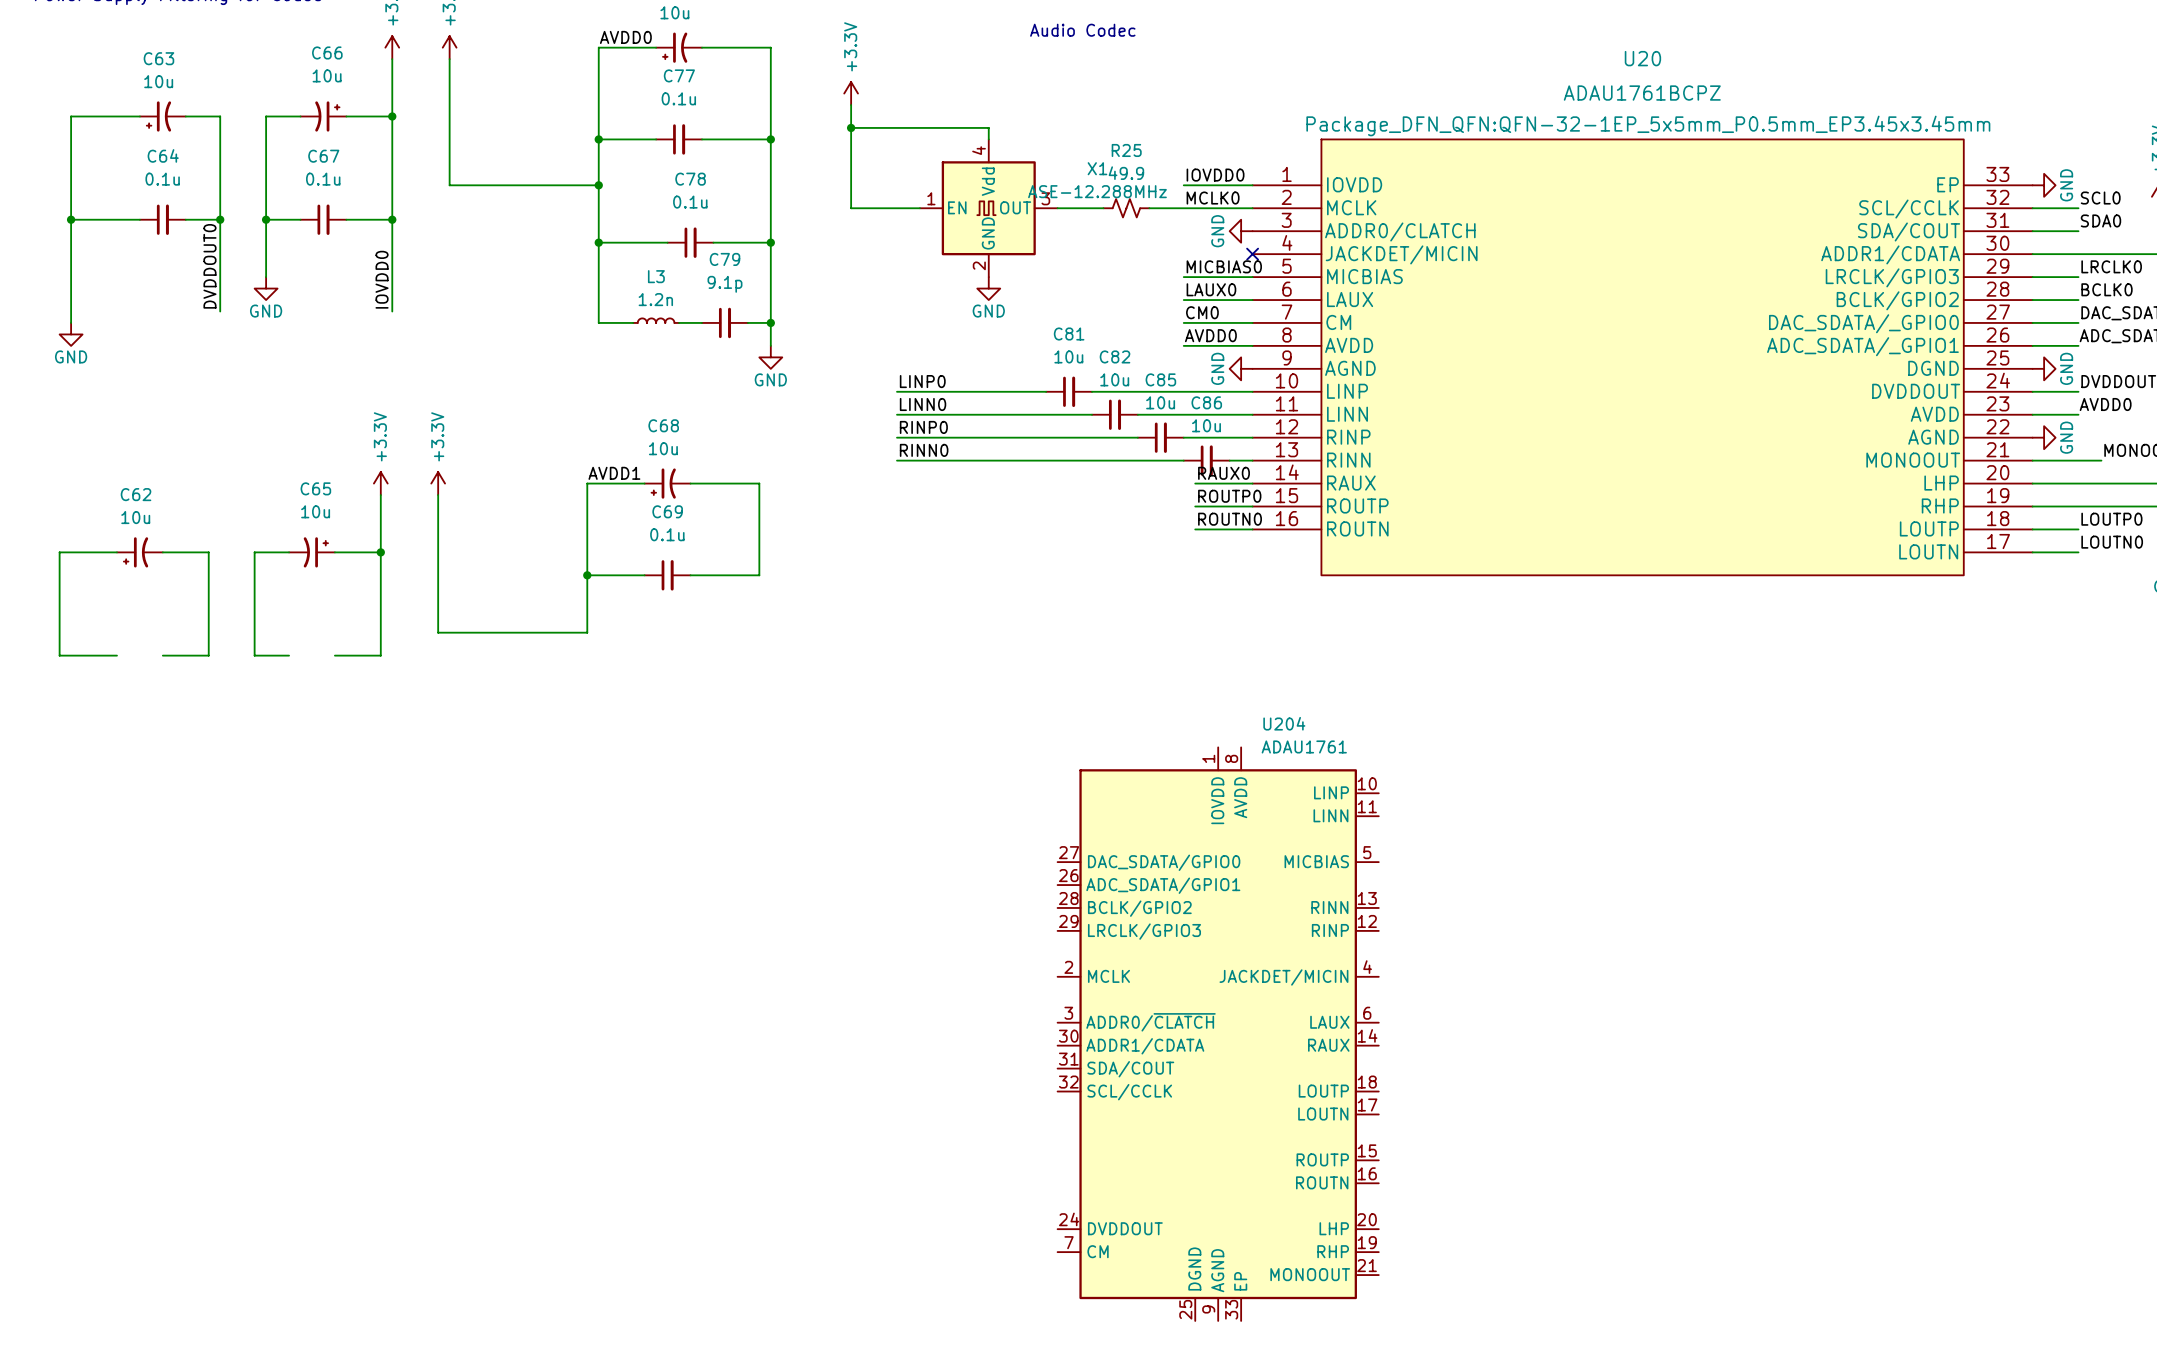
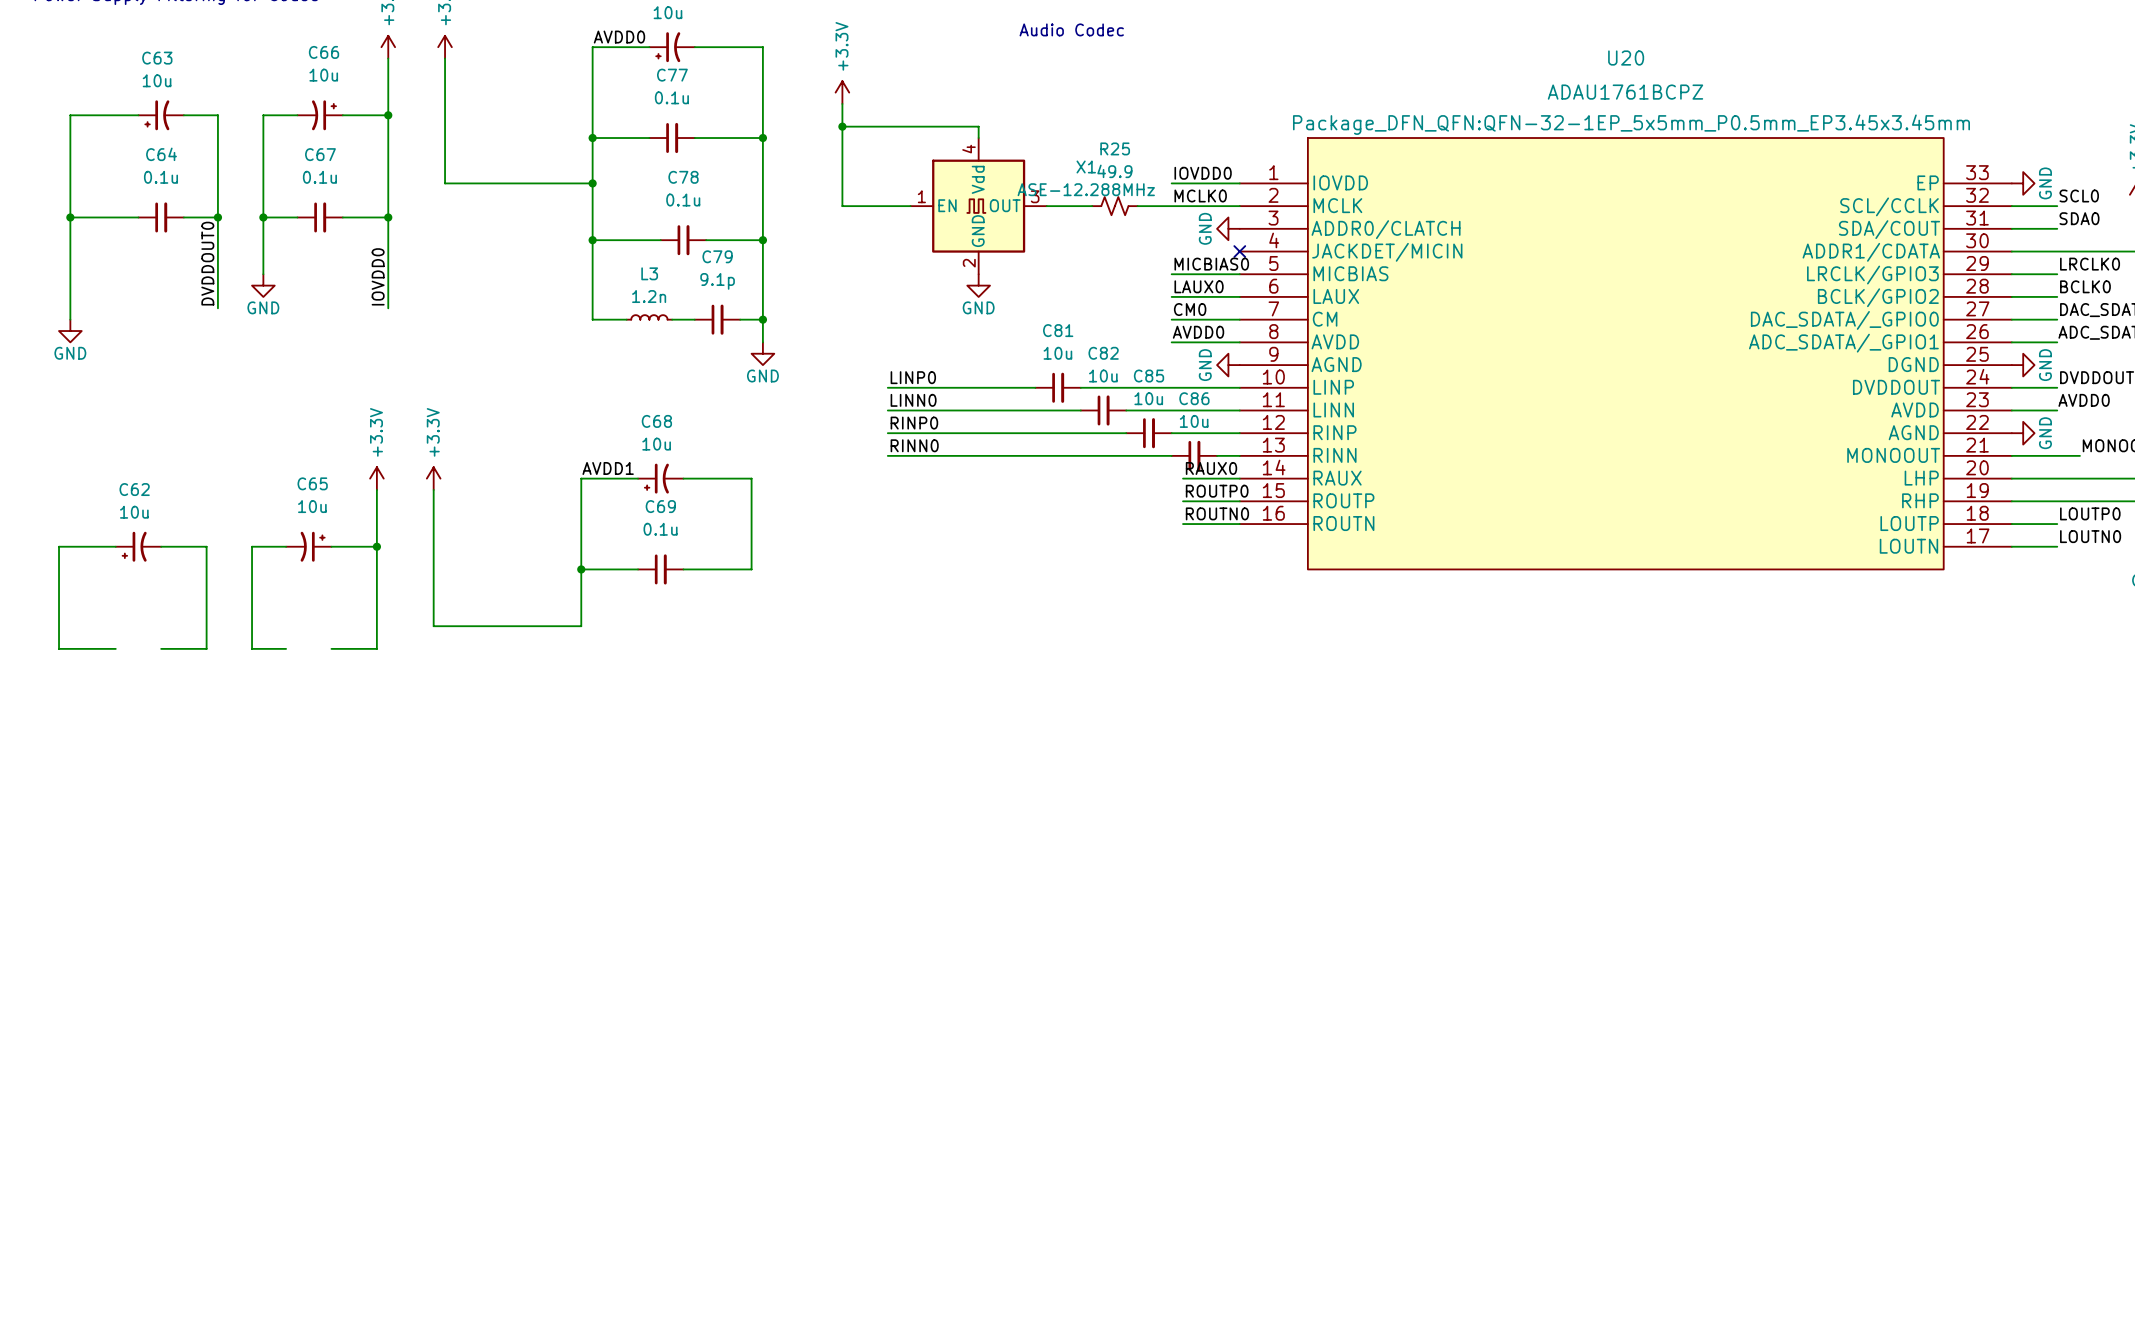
U204: ADAU1761 (1218, 1034) -> none

